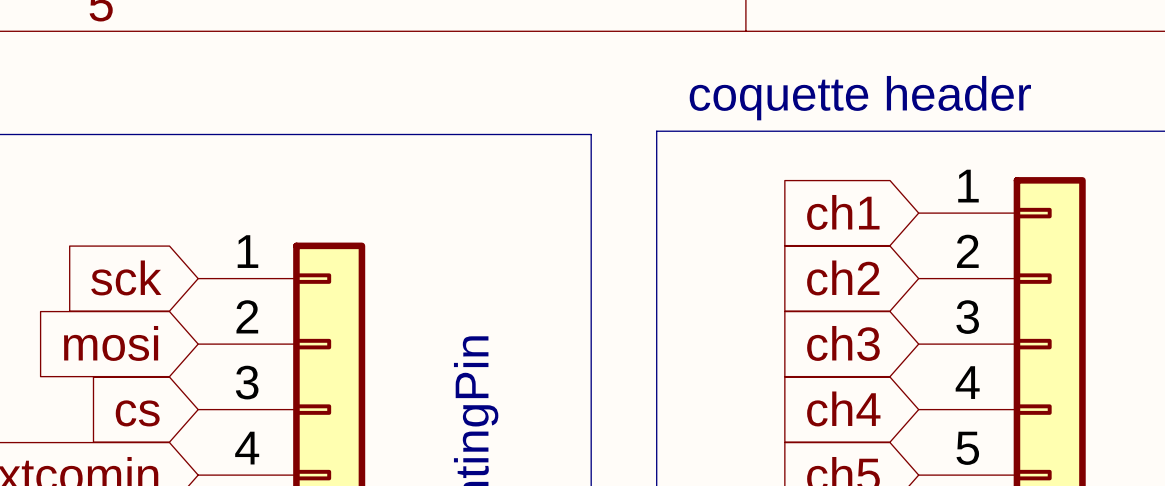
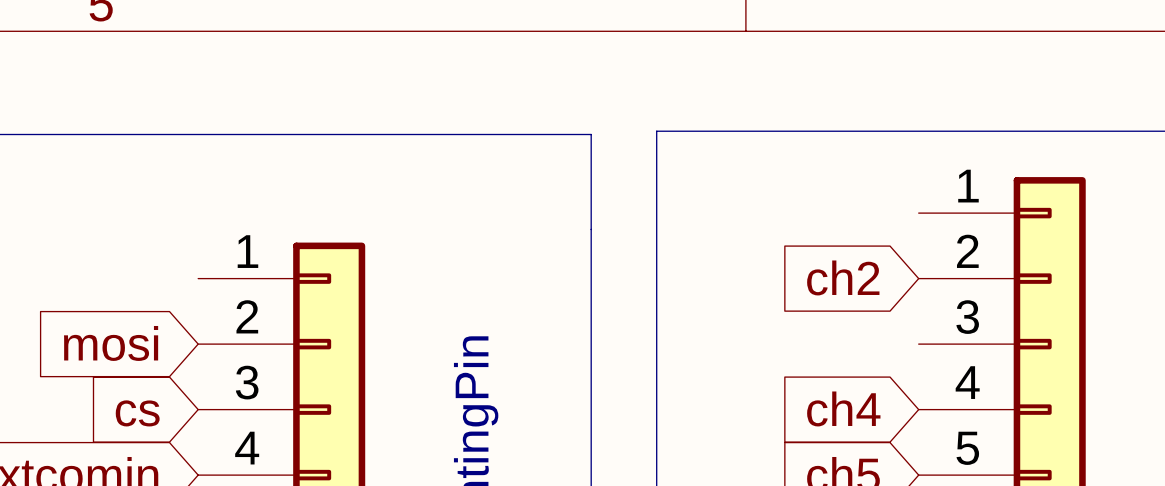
text: coquette header (860, 98) -> none
global label: ch1 (843, 212) -> none
global label: sck (126, 277) -> none
global label: ch3 (843, 343) -> none

